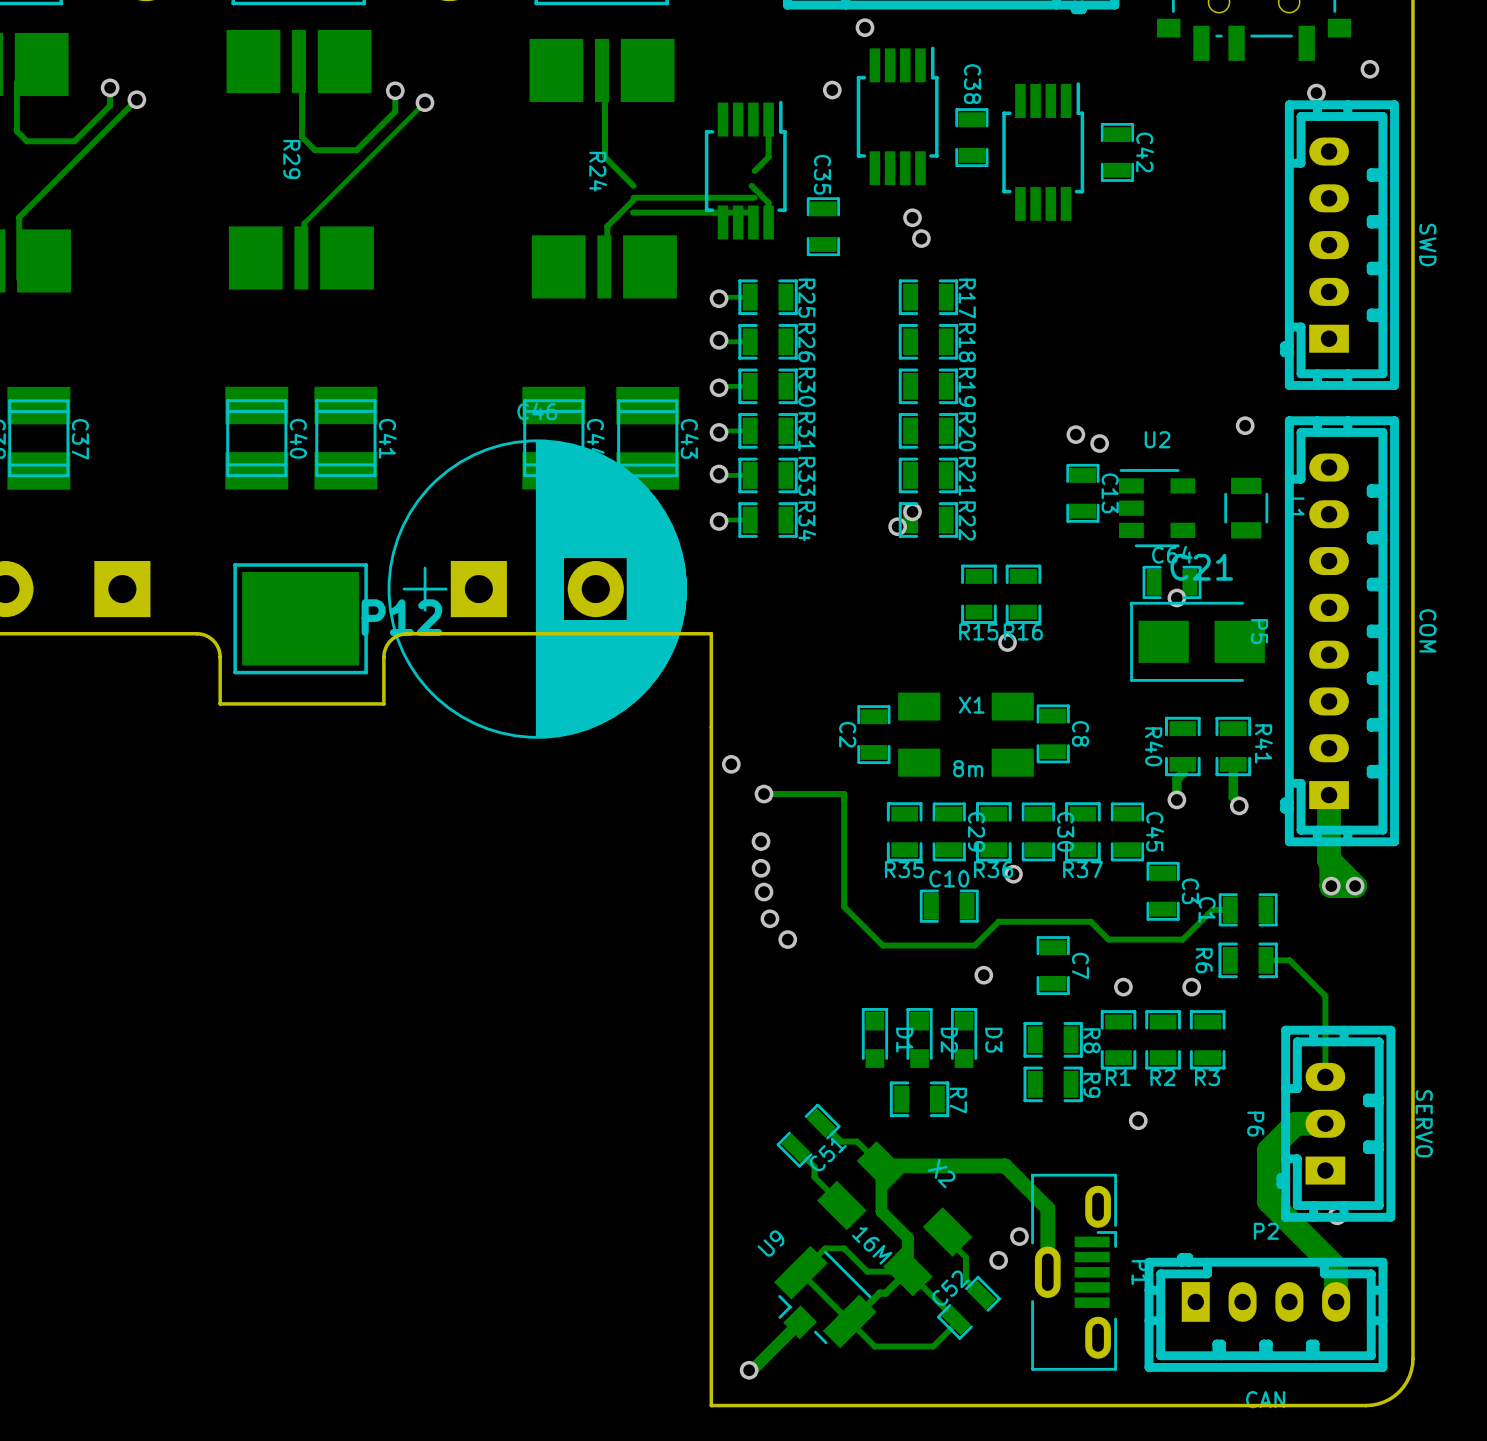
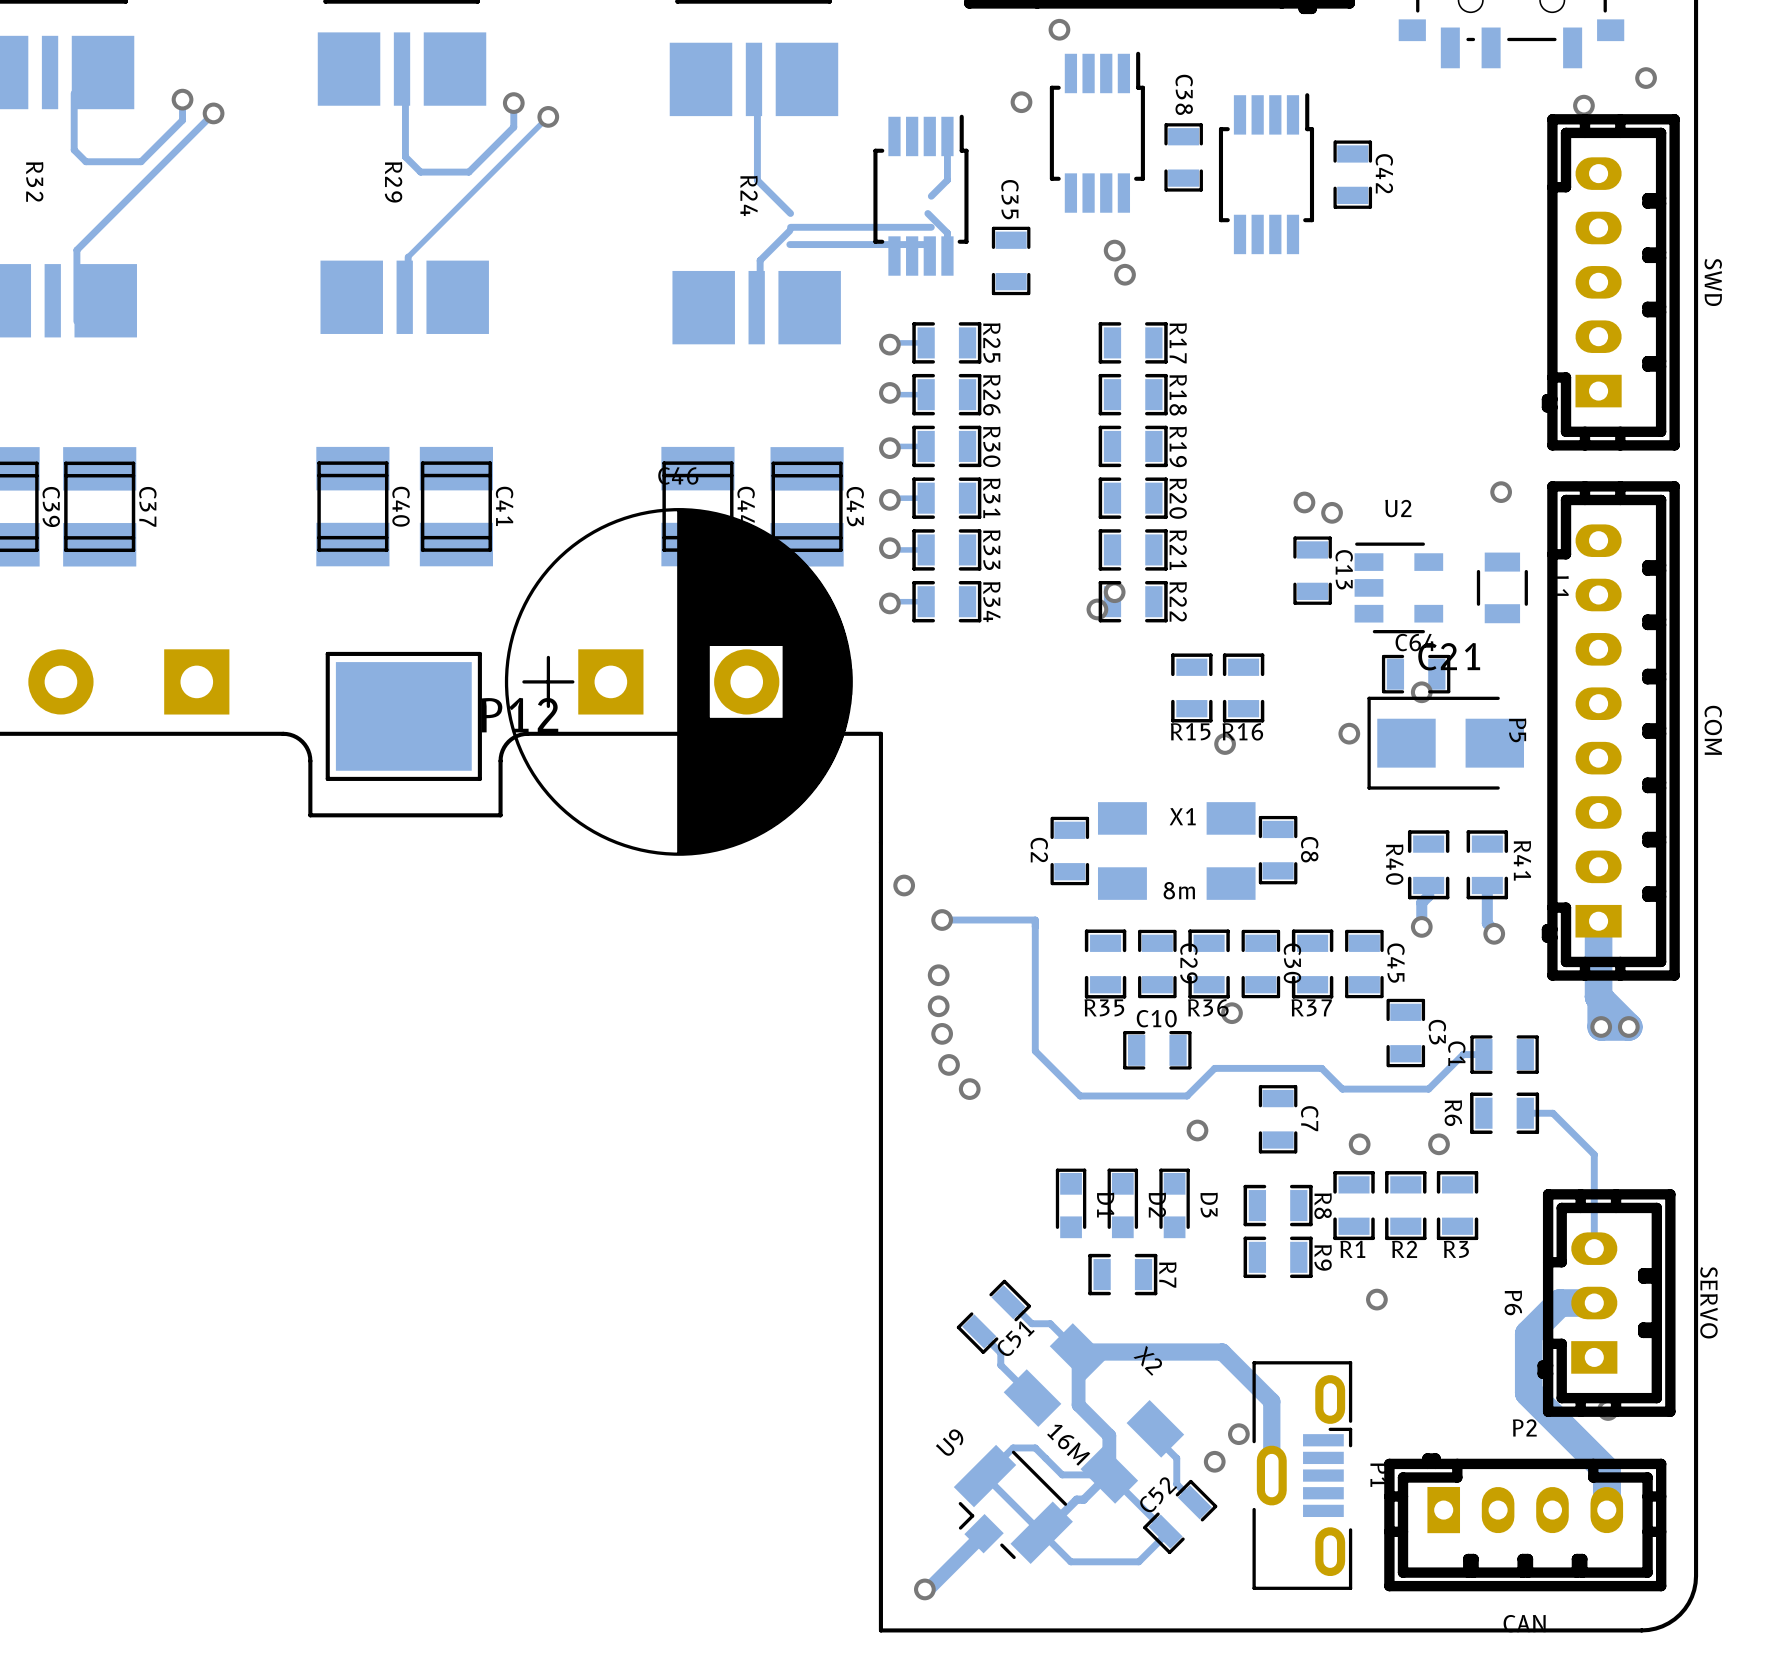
via: none -> (1349, 733)

